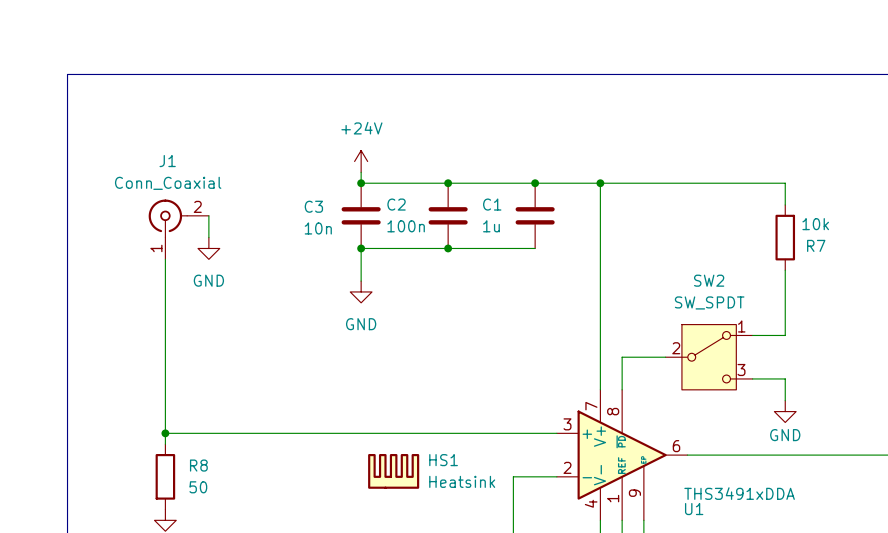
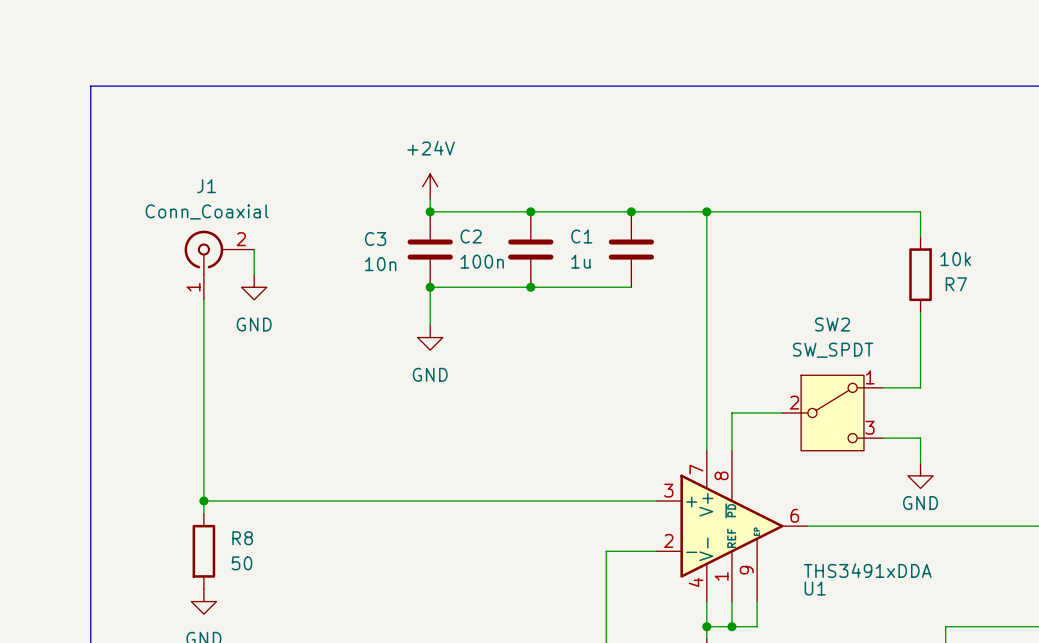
HS1: Heatsink (393, 471) -> none

